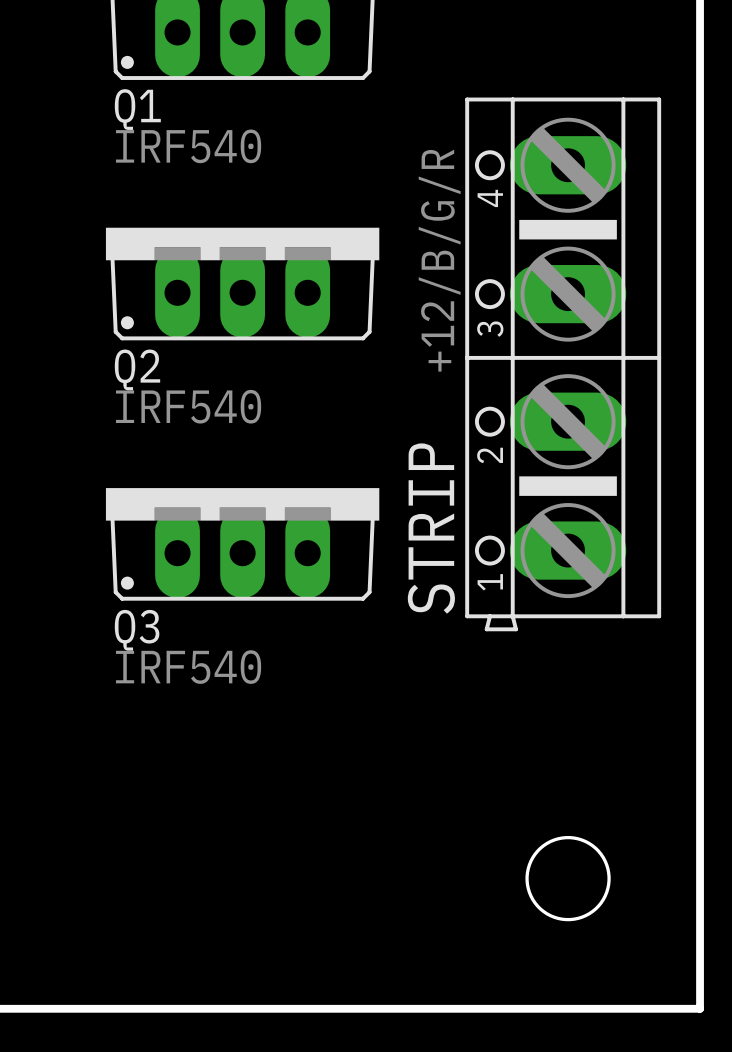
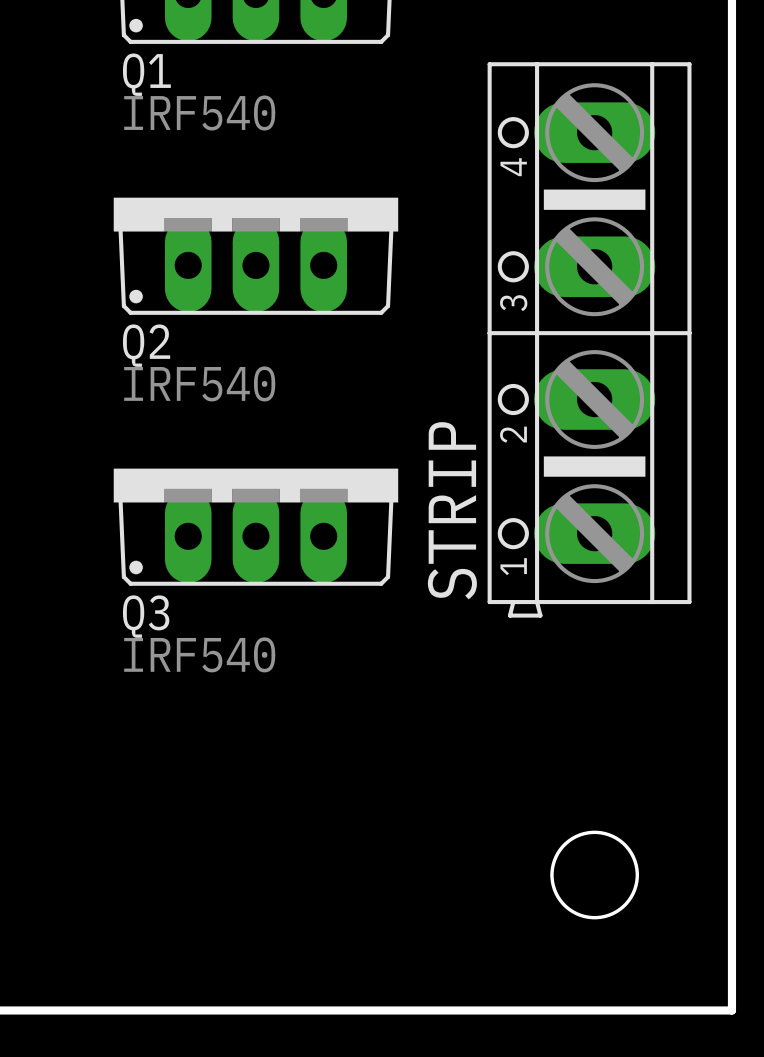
text: +12/B/G/R (439, 260) -> none

